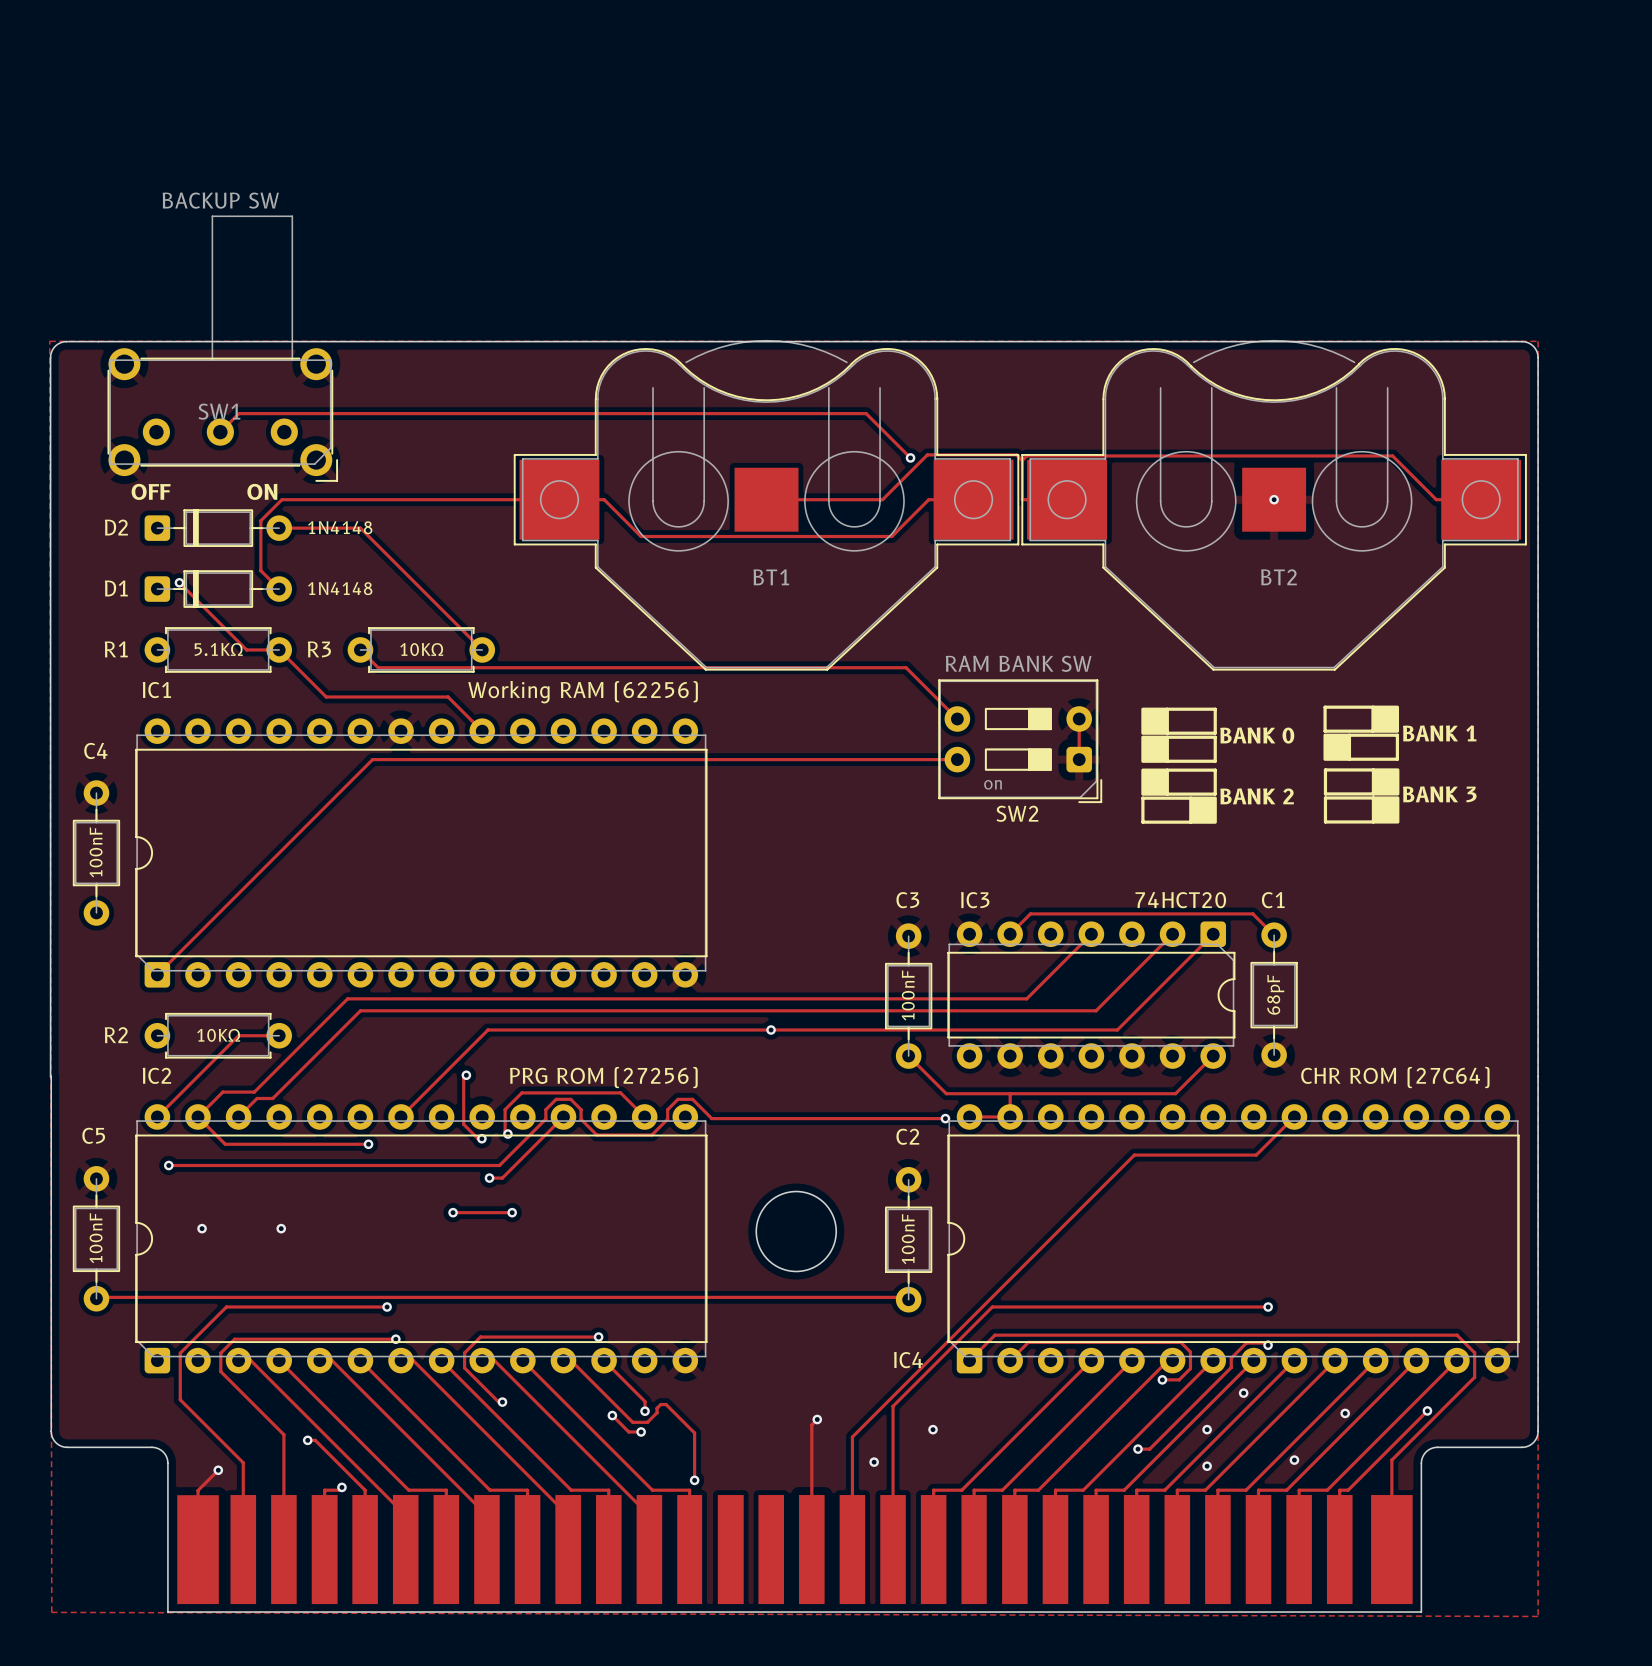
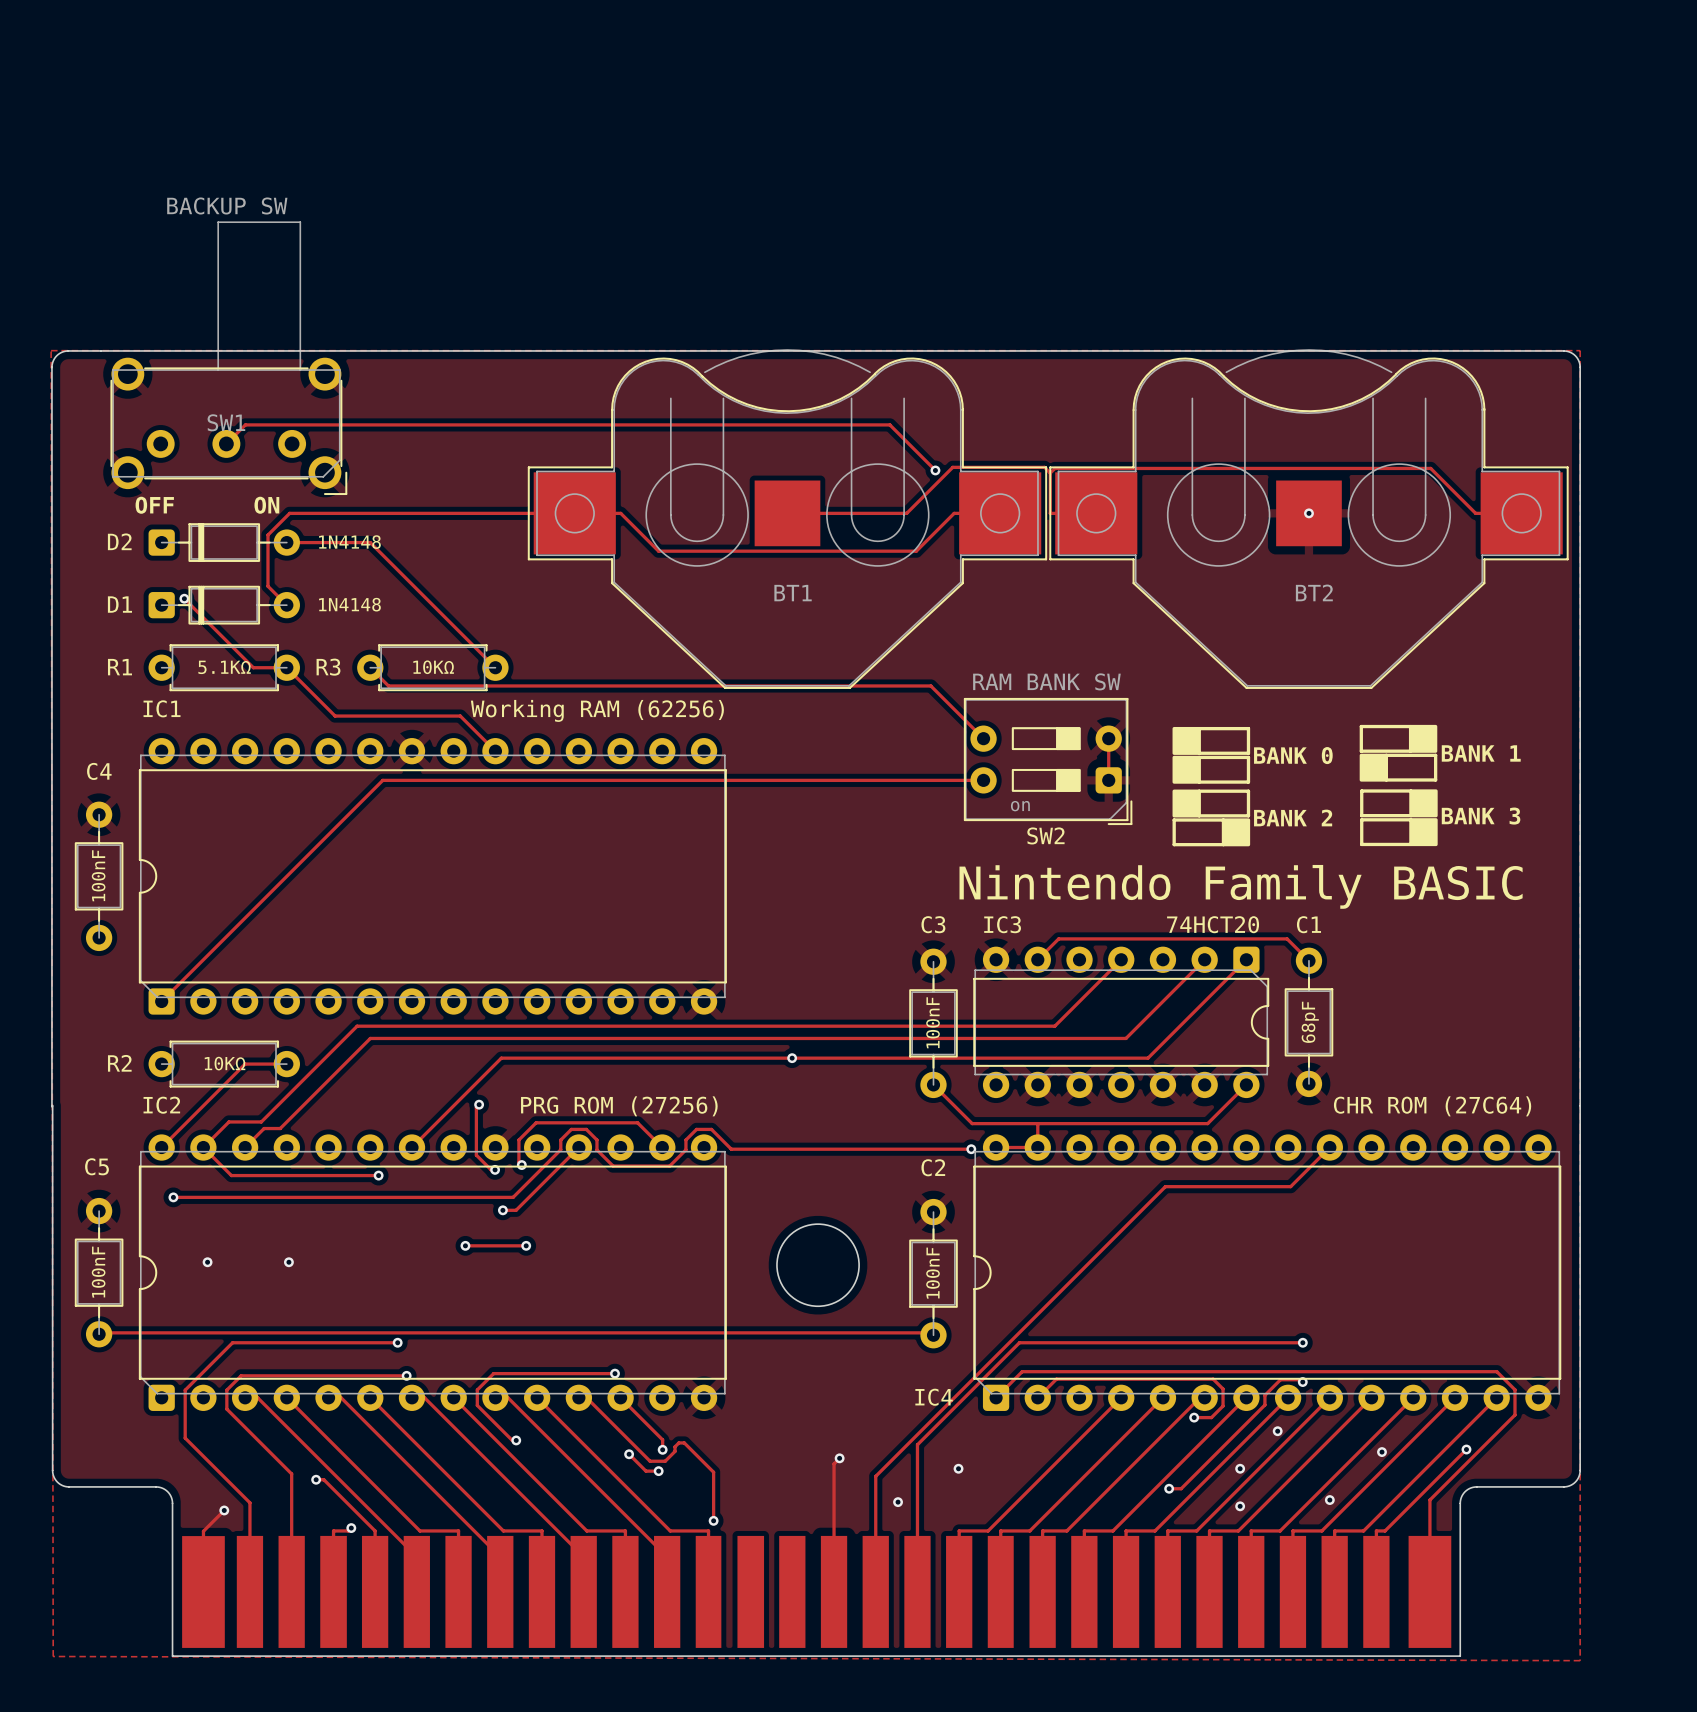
text: none -> Nintendo Family BASIC (1241, 886)

